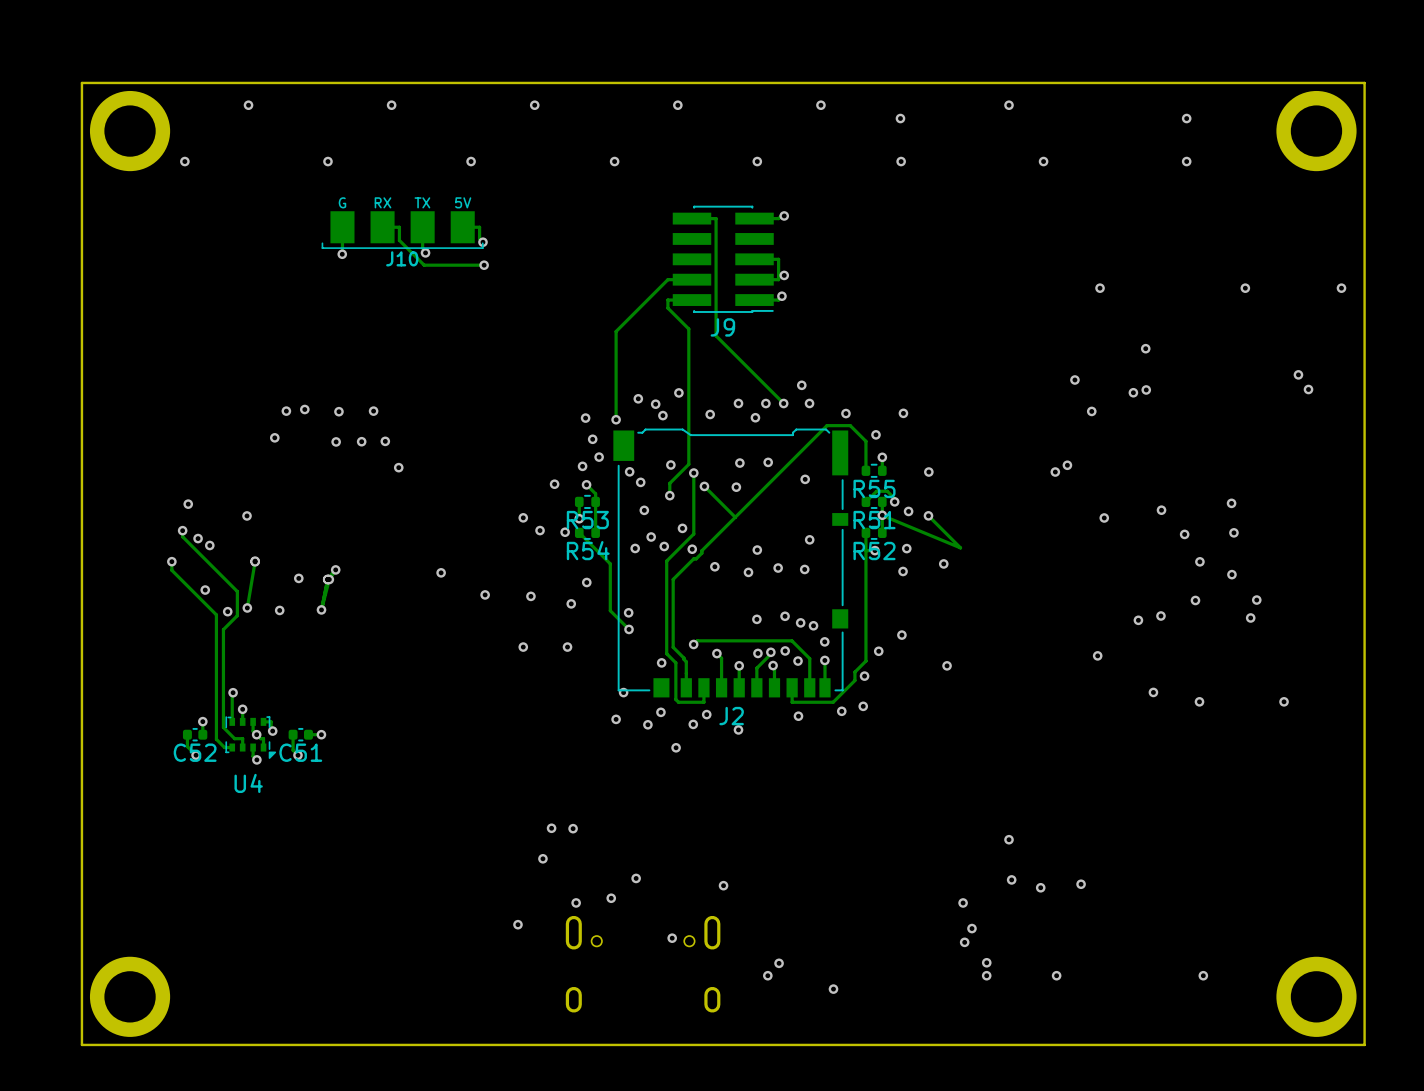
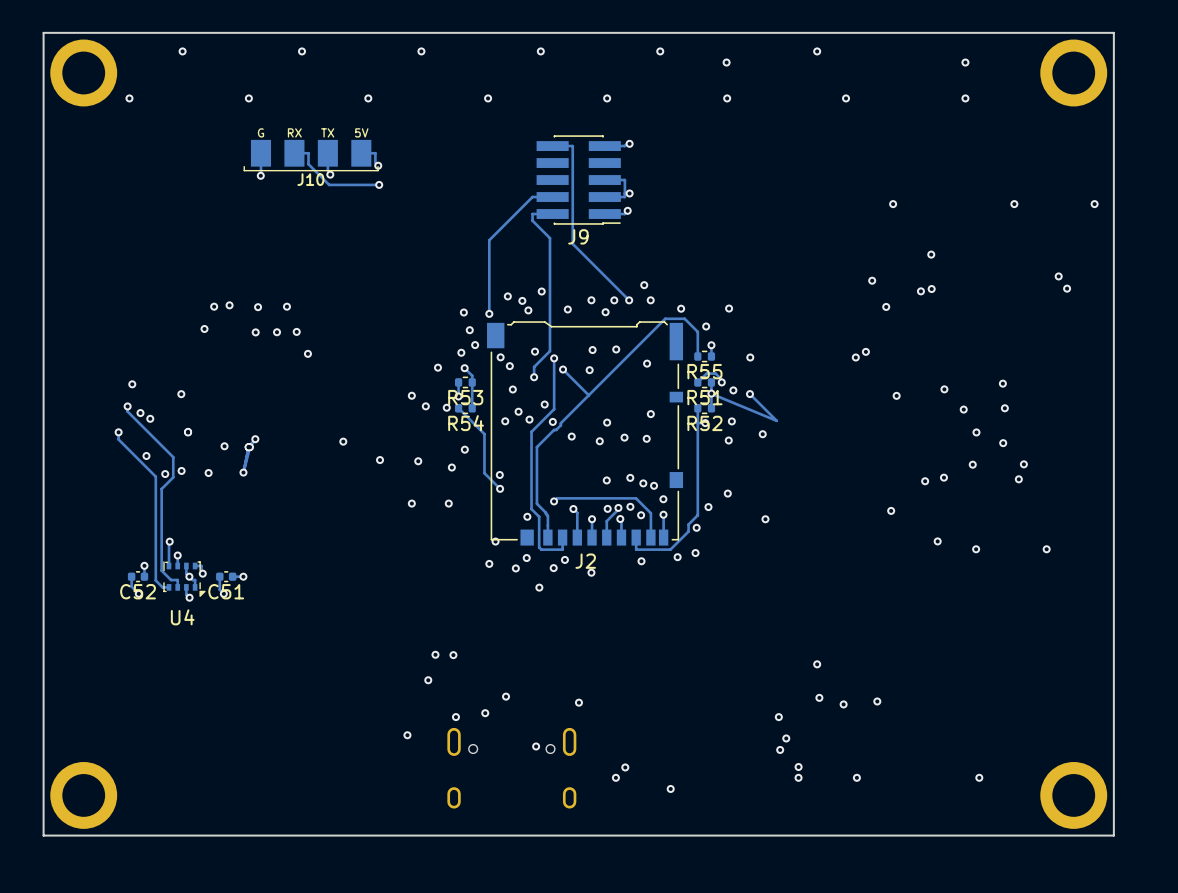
track: (255, 561) (247, 607) -> none

